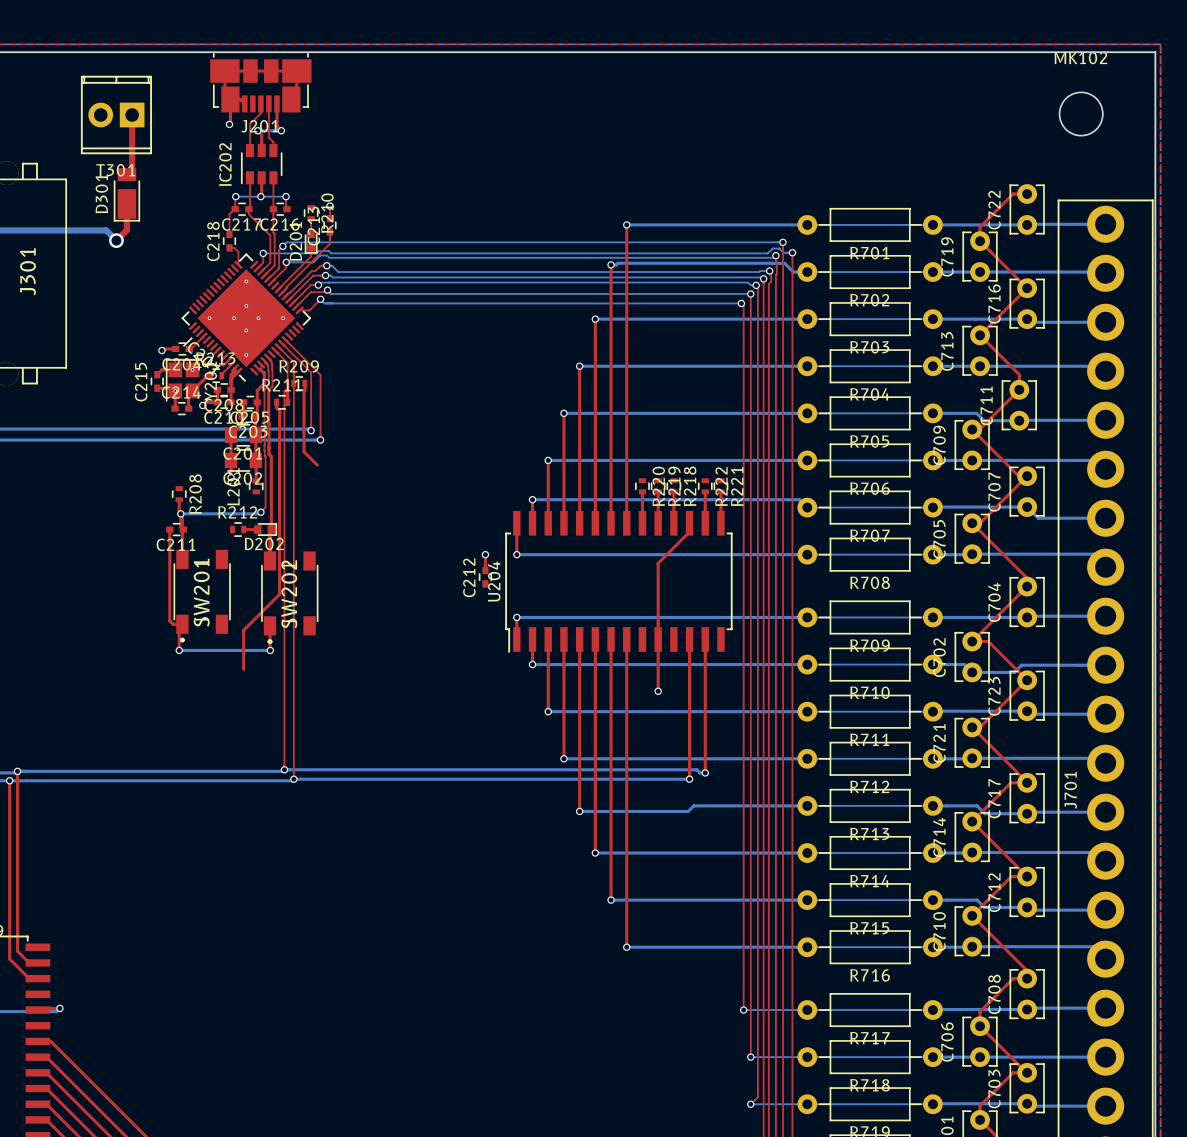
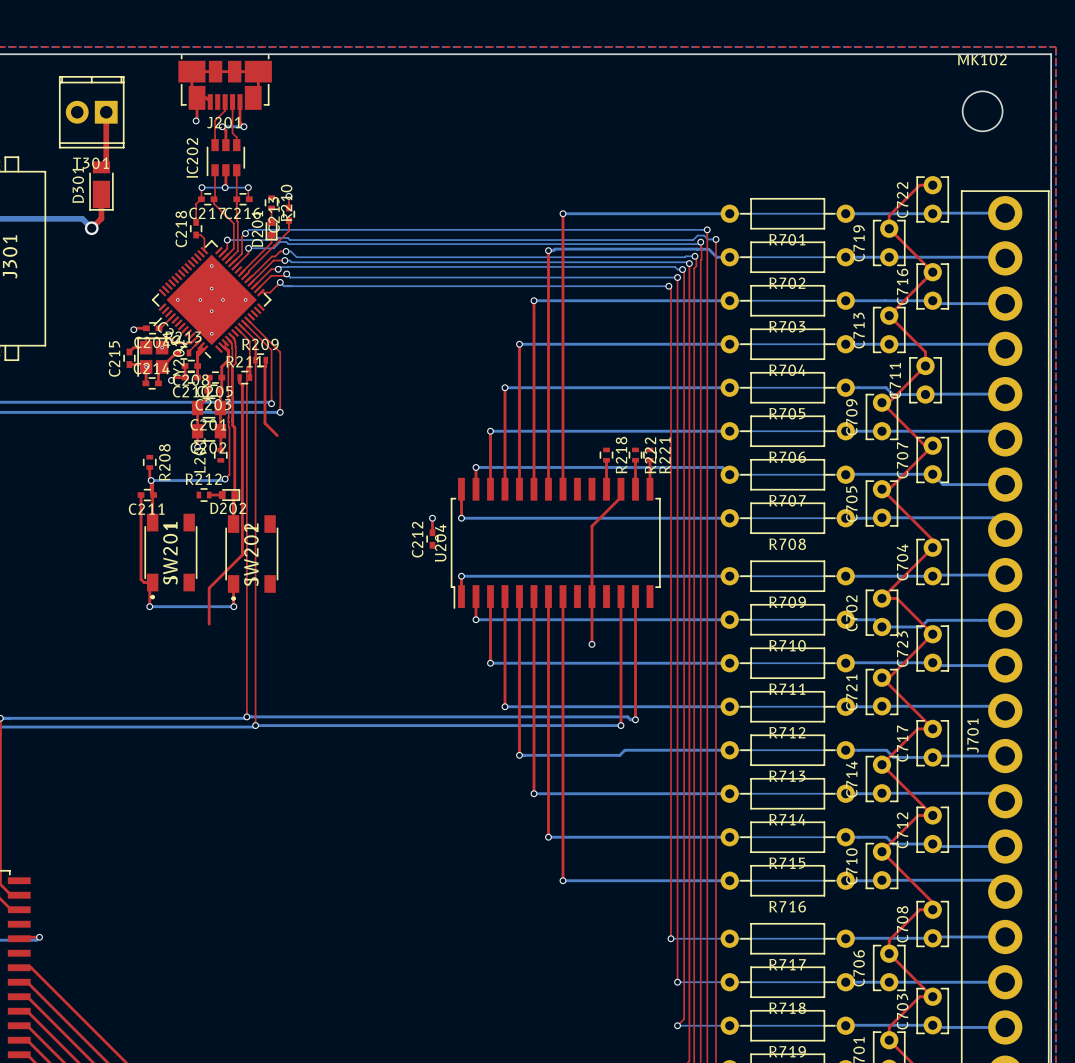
R220: (642, 486) -> none
R219: (658, 486) -> none
top track: (642, 491) (642, 523) -> none
top track: (658, 491) (658, 523) -> none

